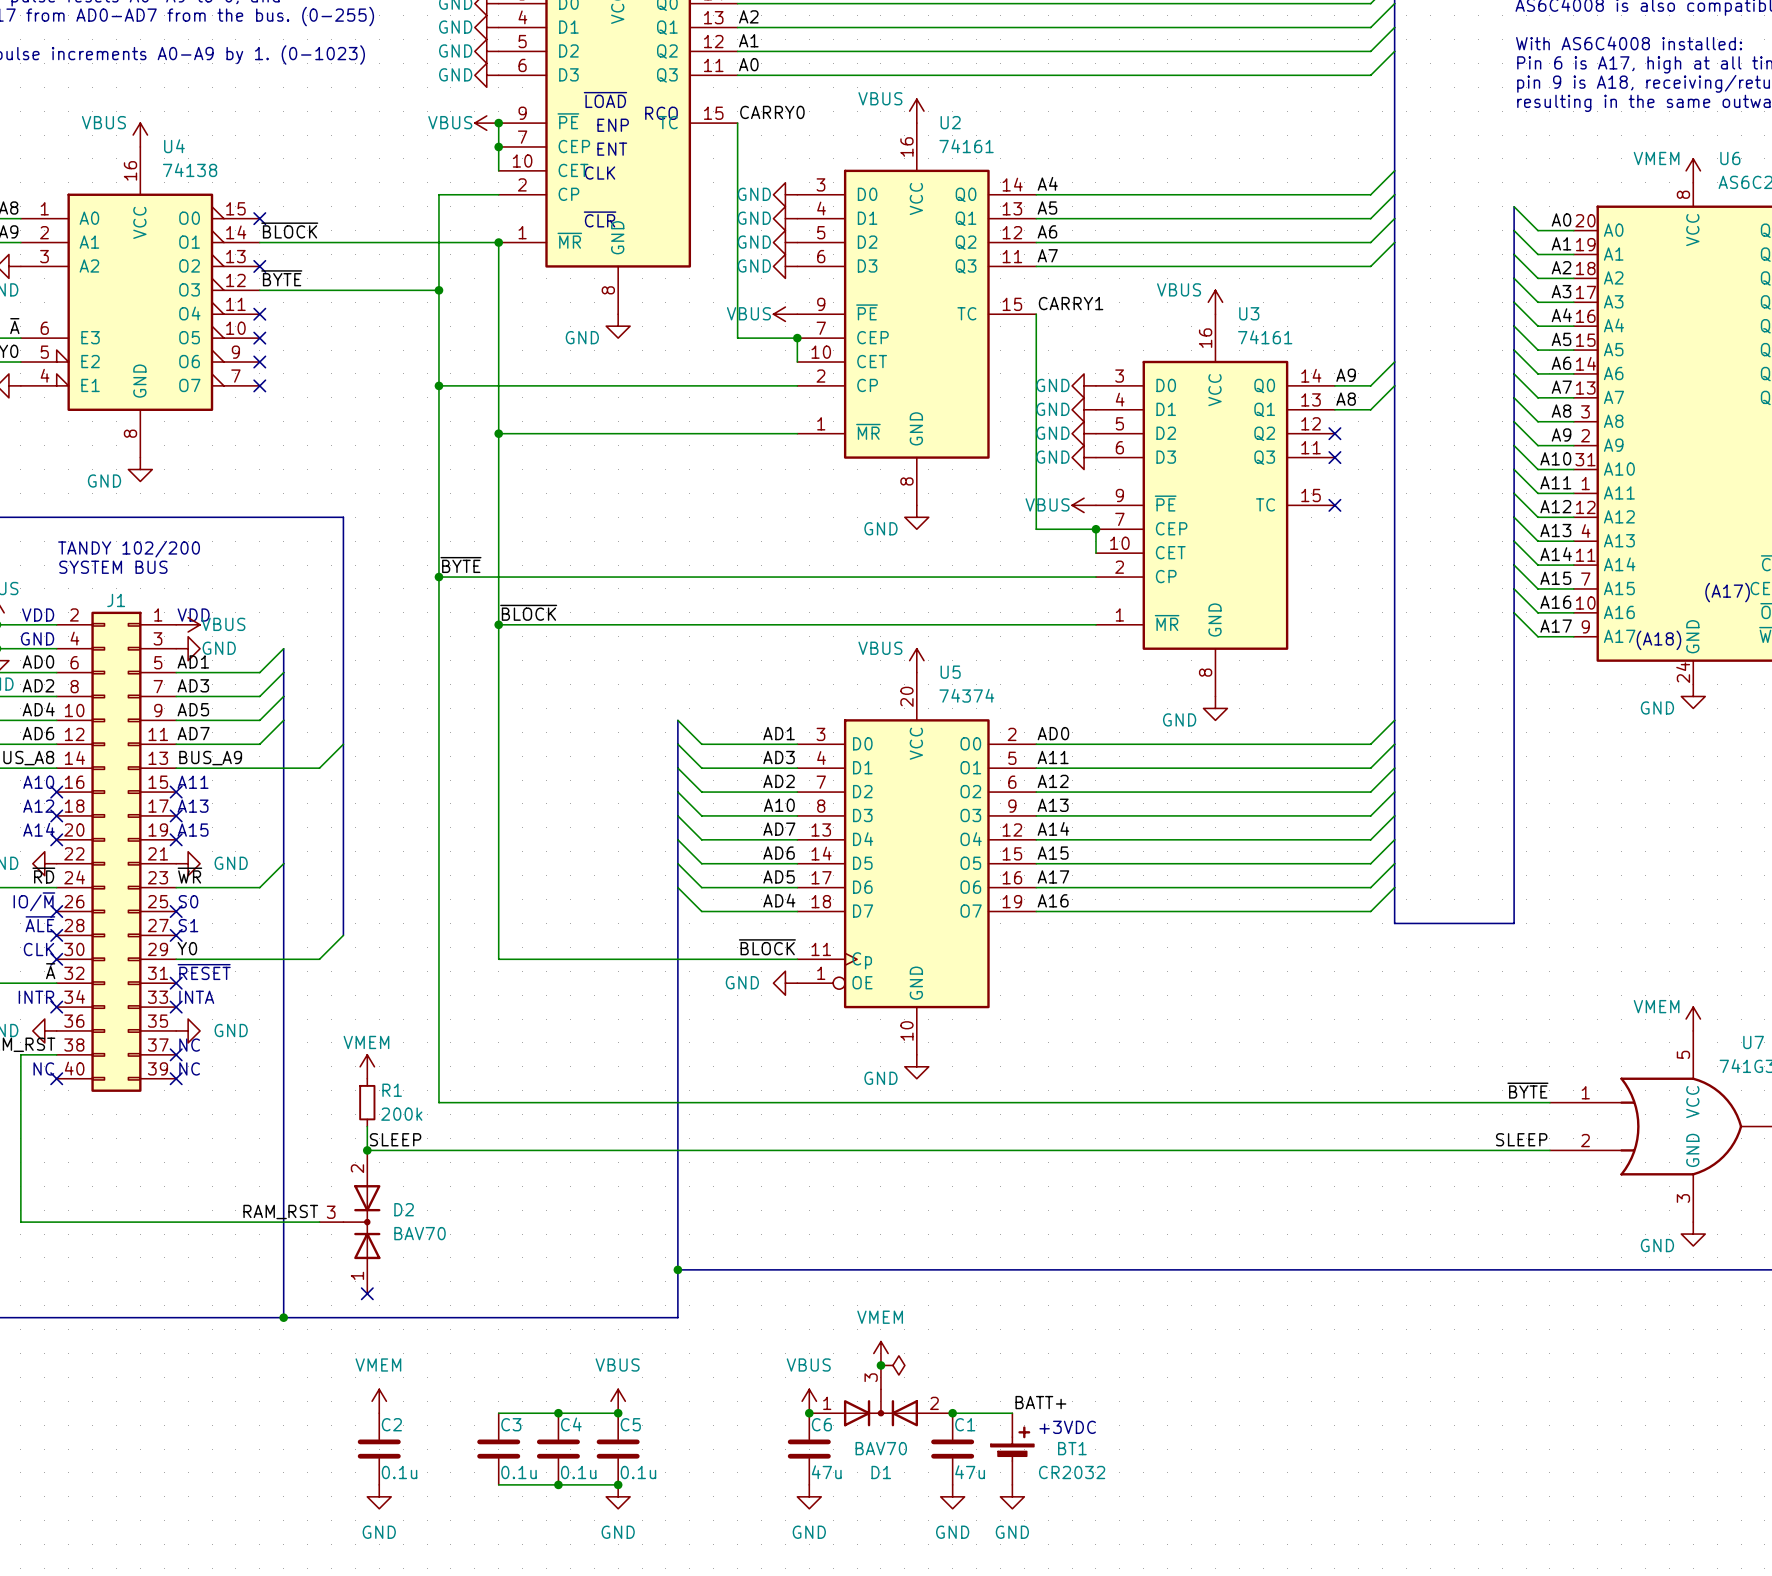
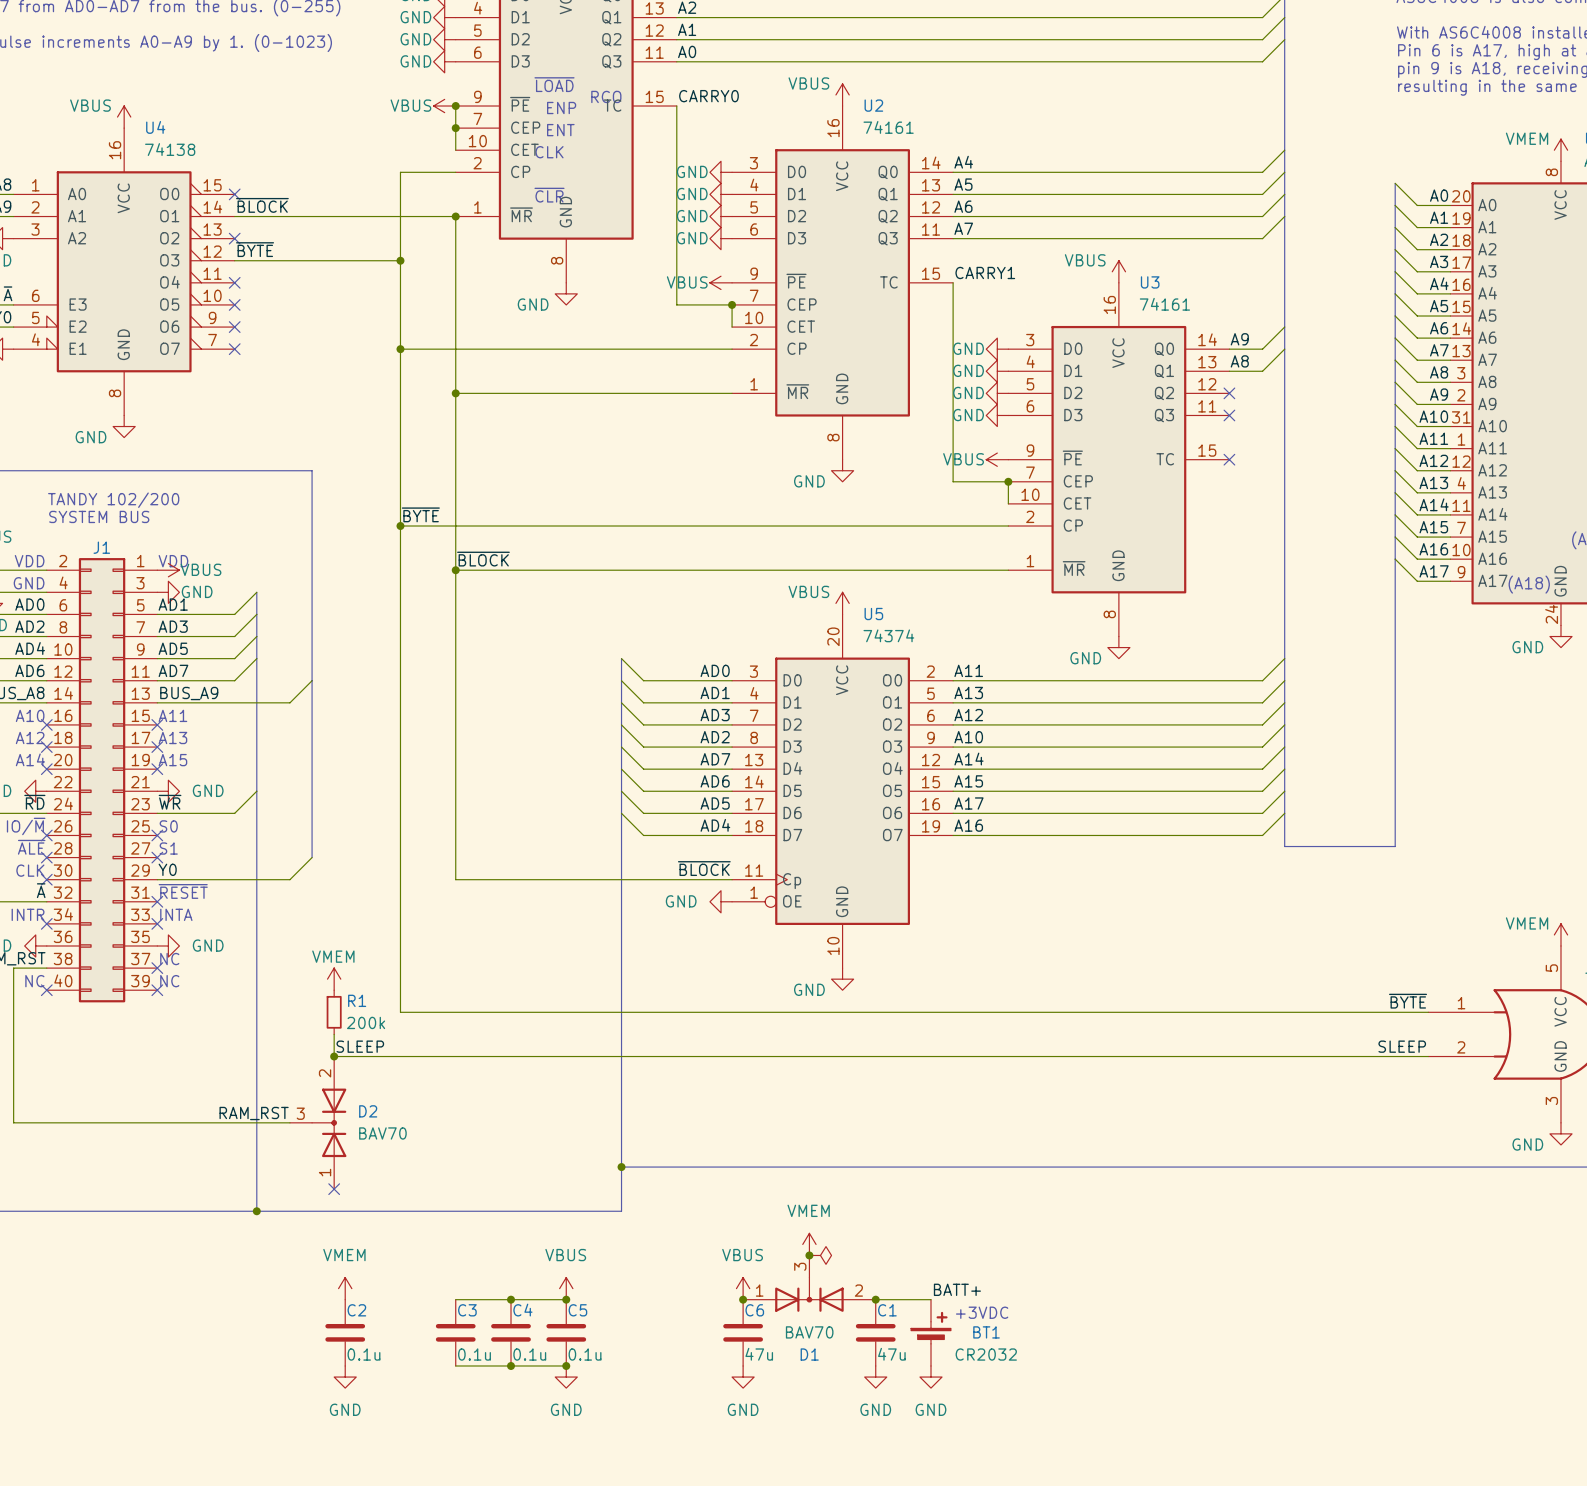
label: AD1 (779, 733) -> AD0 (715, 670)
label: AD0 (1053, 733) -> A11 (968, 670)
label: AD3 (779, 757) -> AD1 (715, 692)
label: A11 (1053, 757) -> A13 (968, 692)
label: AD2 (779, 781) -> AD3 (715, 715)
label: A10 (779, 805) -> AD2 (715, 737)
label: A13 (1053, 805) -> A10 (968, 737)

